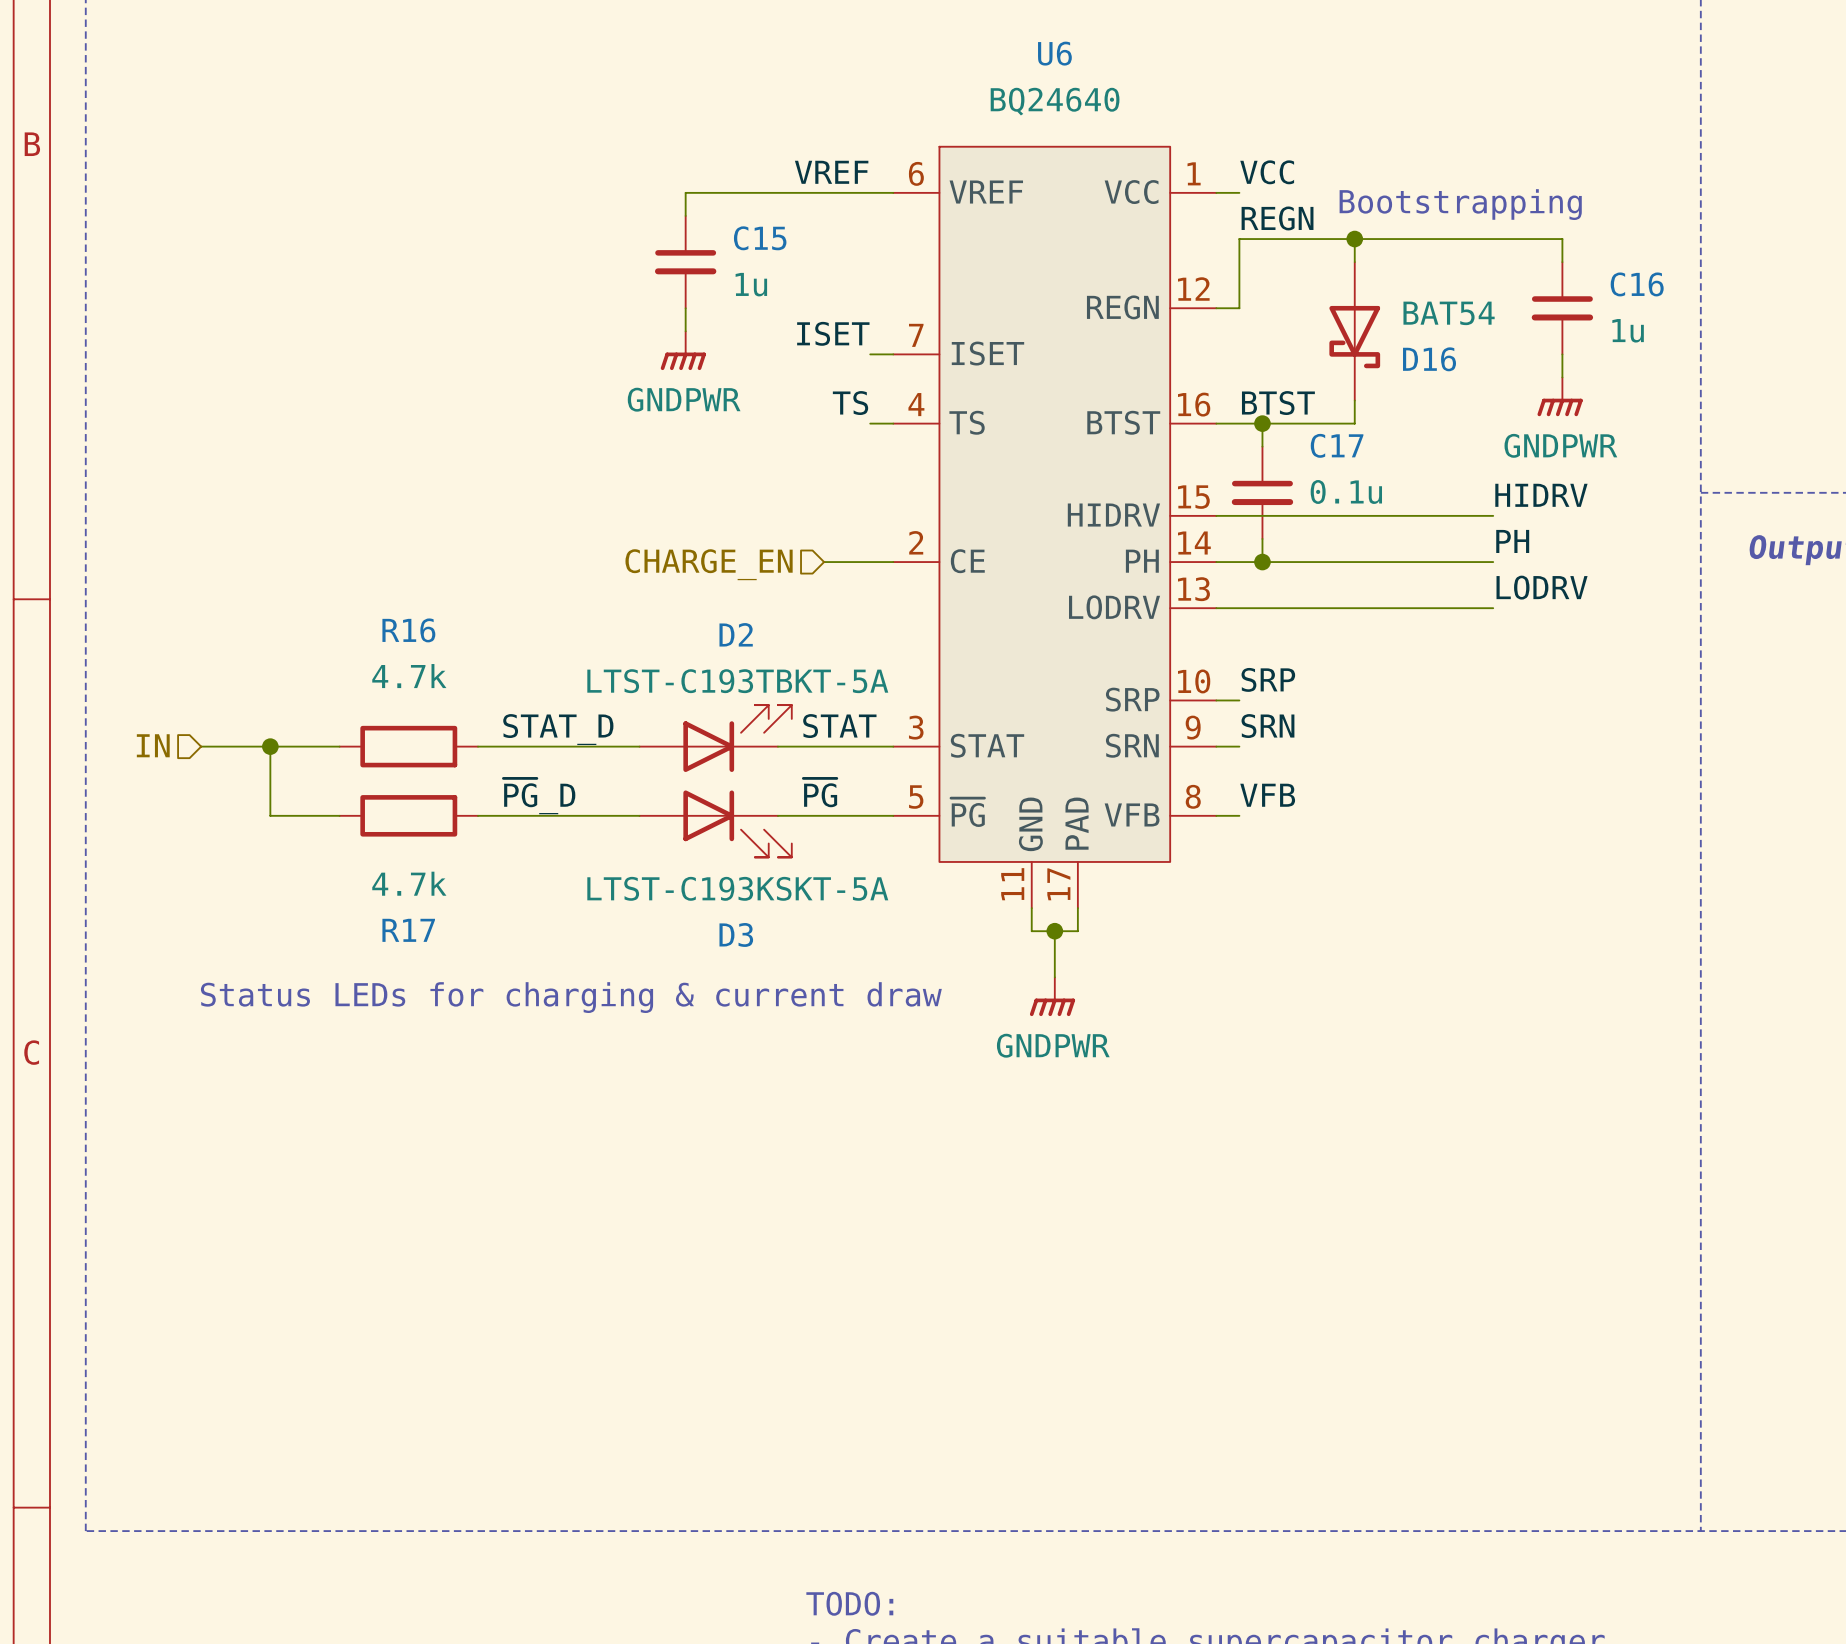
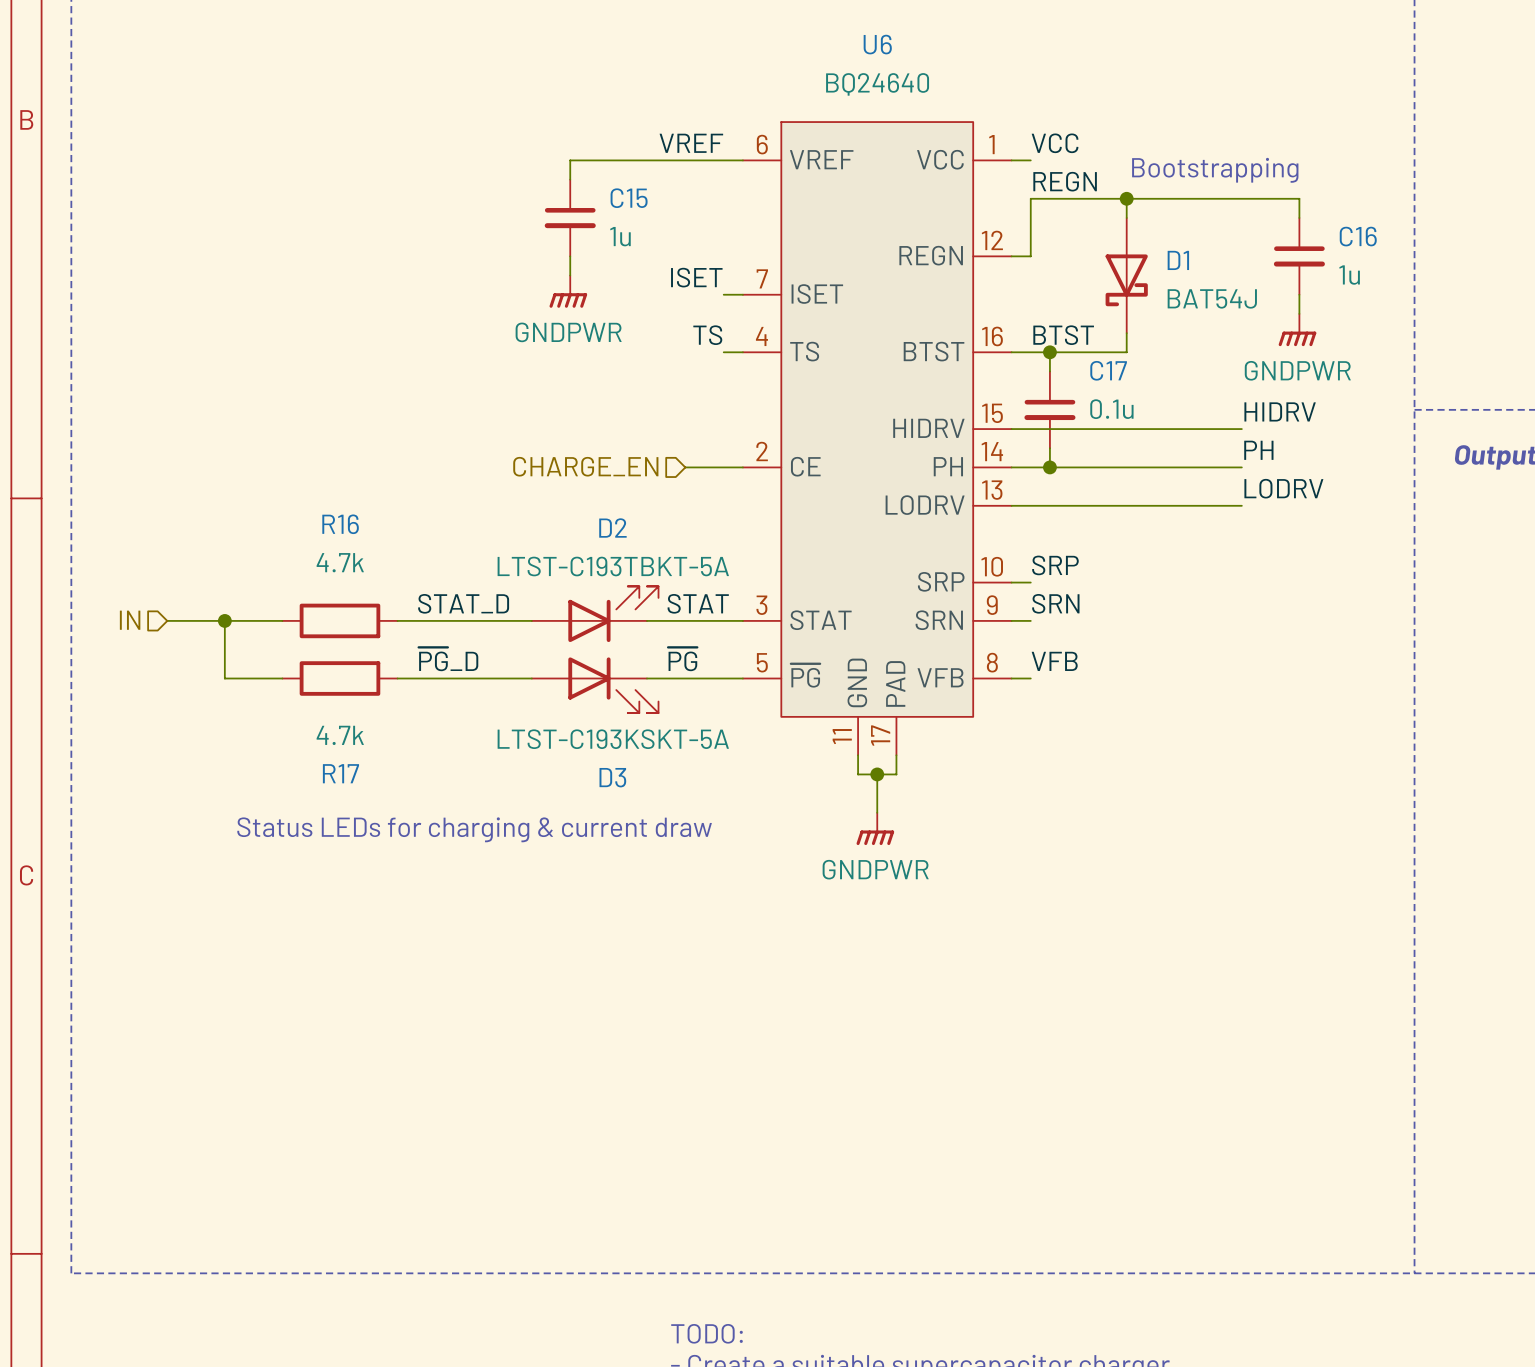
D16: BAT54 (1354, 331) -> none
D1: none -> BAT54J (1126, 275)

